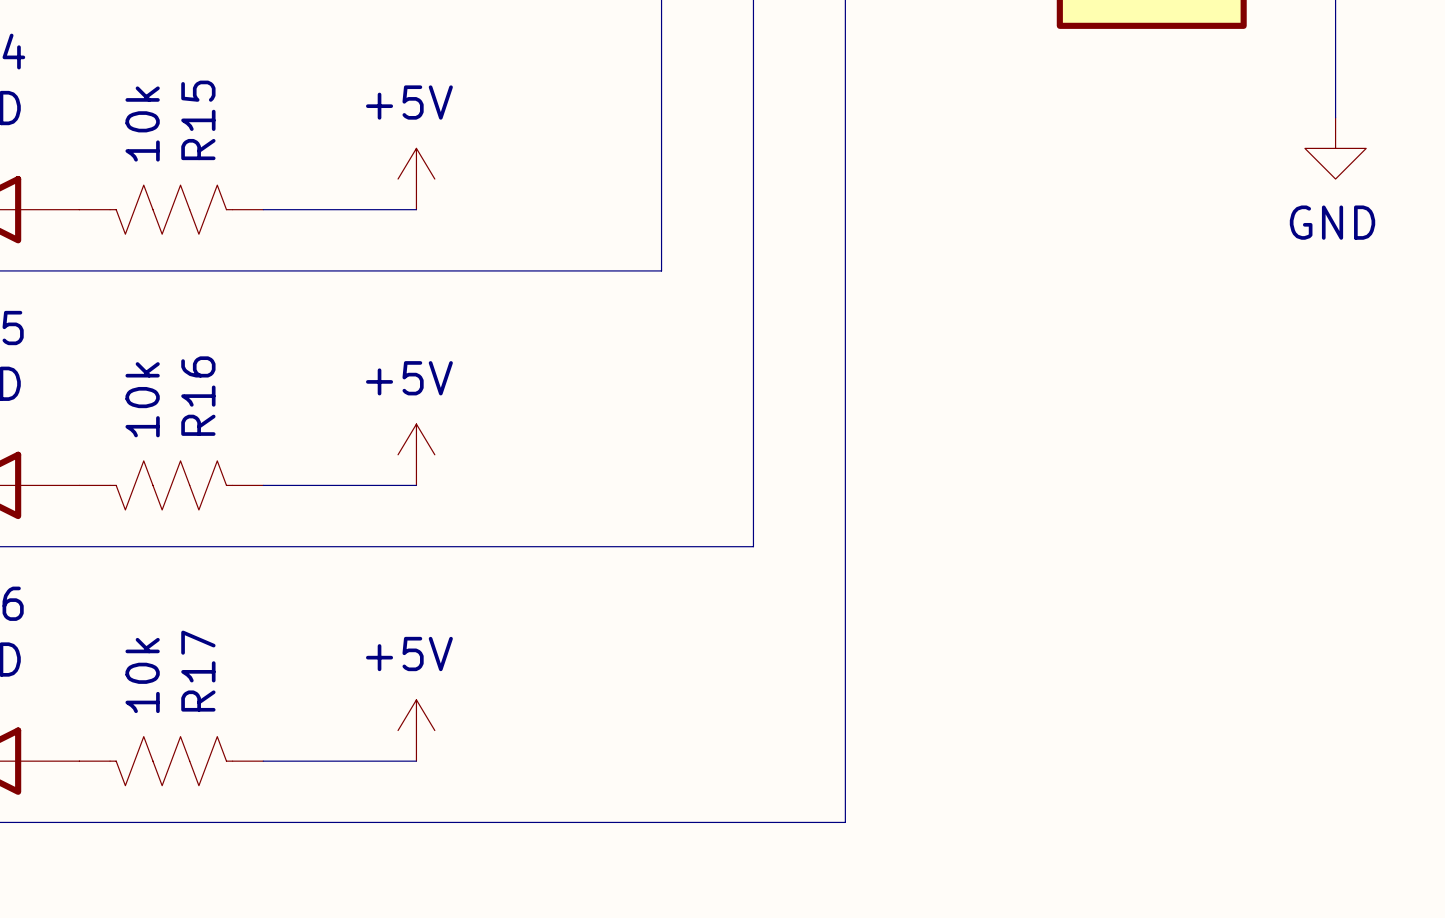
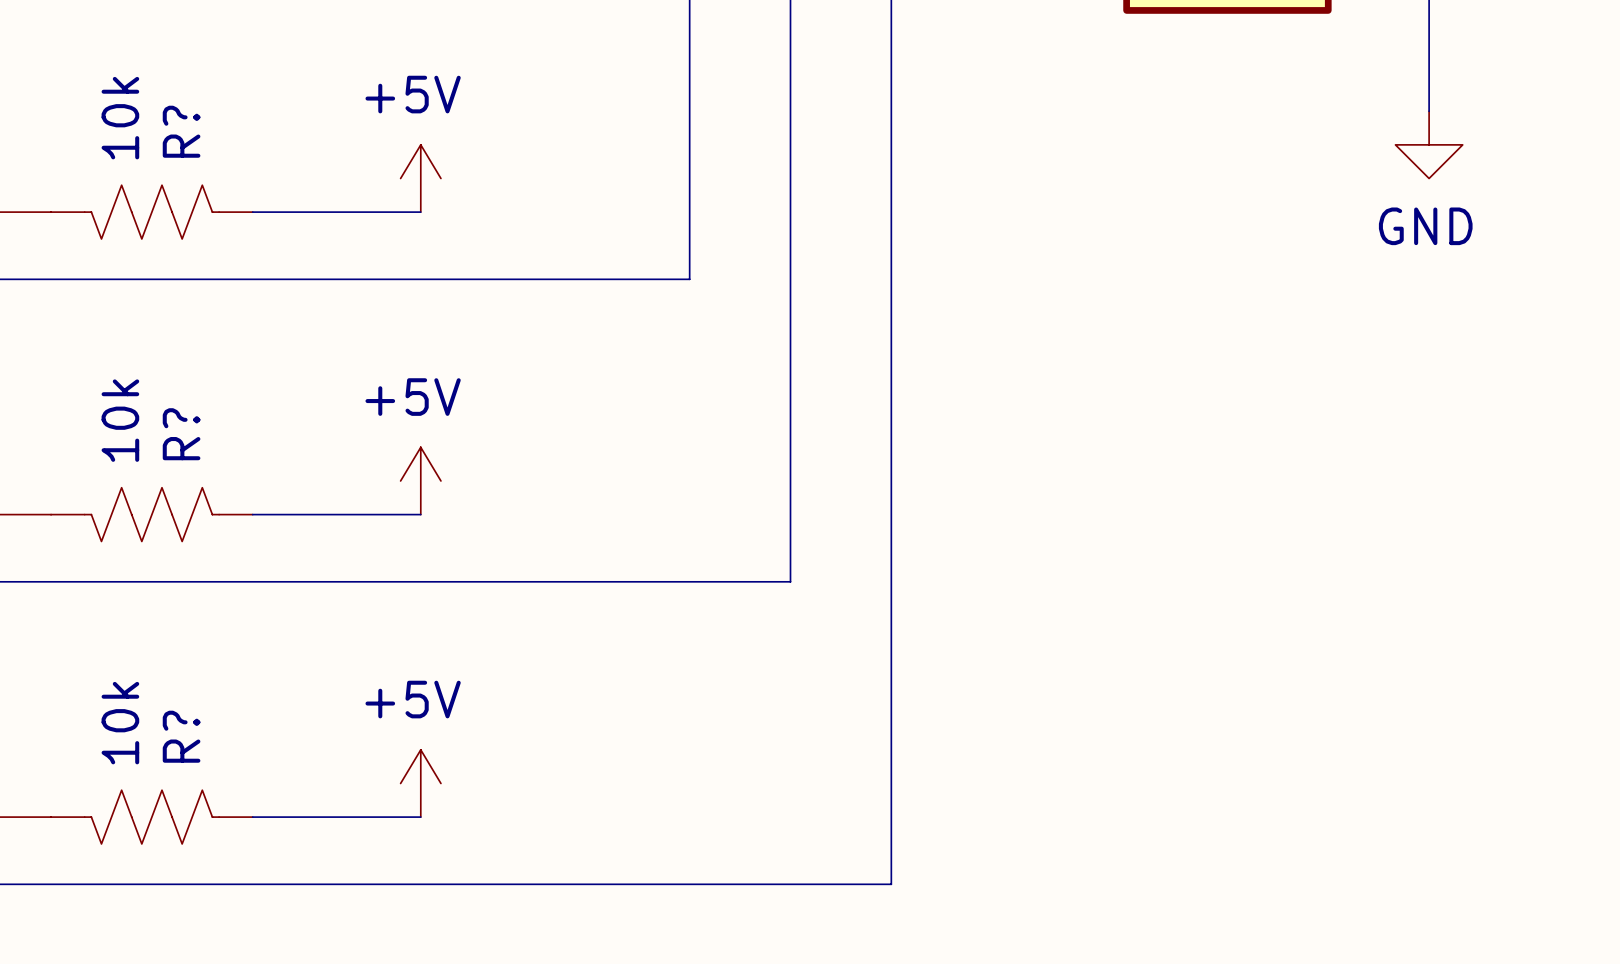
R15 name: R15 (198, 120) -> R? (181, 131)
R16 name: R16 (198, 396) -> R? (181, 434)
R17 name: R17 (198, 671) -> R? (181, 736)

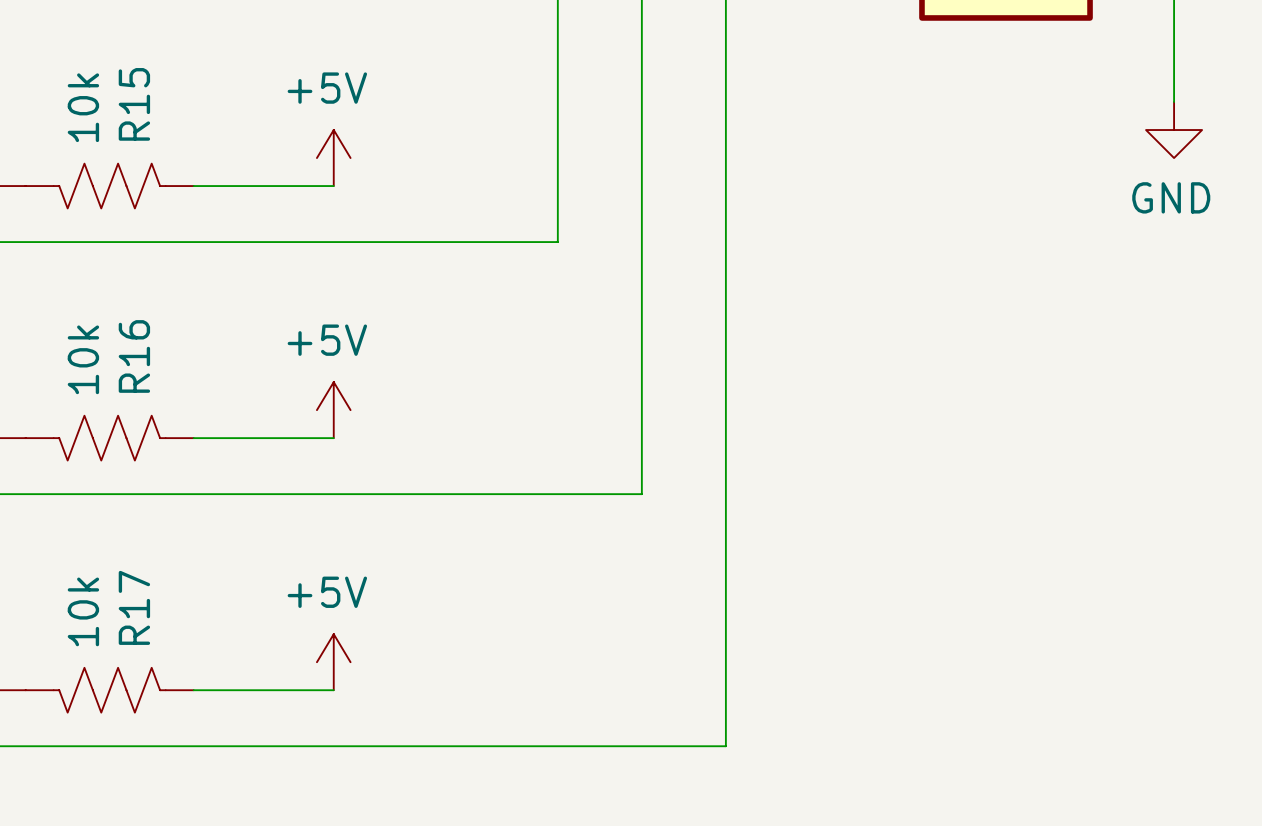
R? name: R? (181, 131) -> R15 (134, 104)
R? name: R? (181, 434) -> R16 (134, 356)
R? name: R? (181, 736) -> R17 (134, 607)

